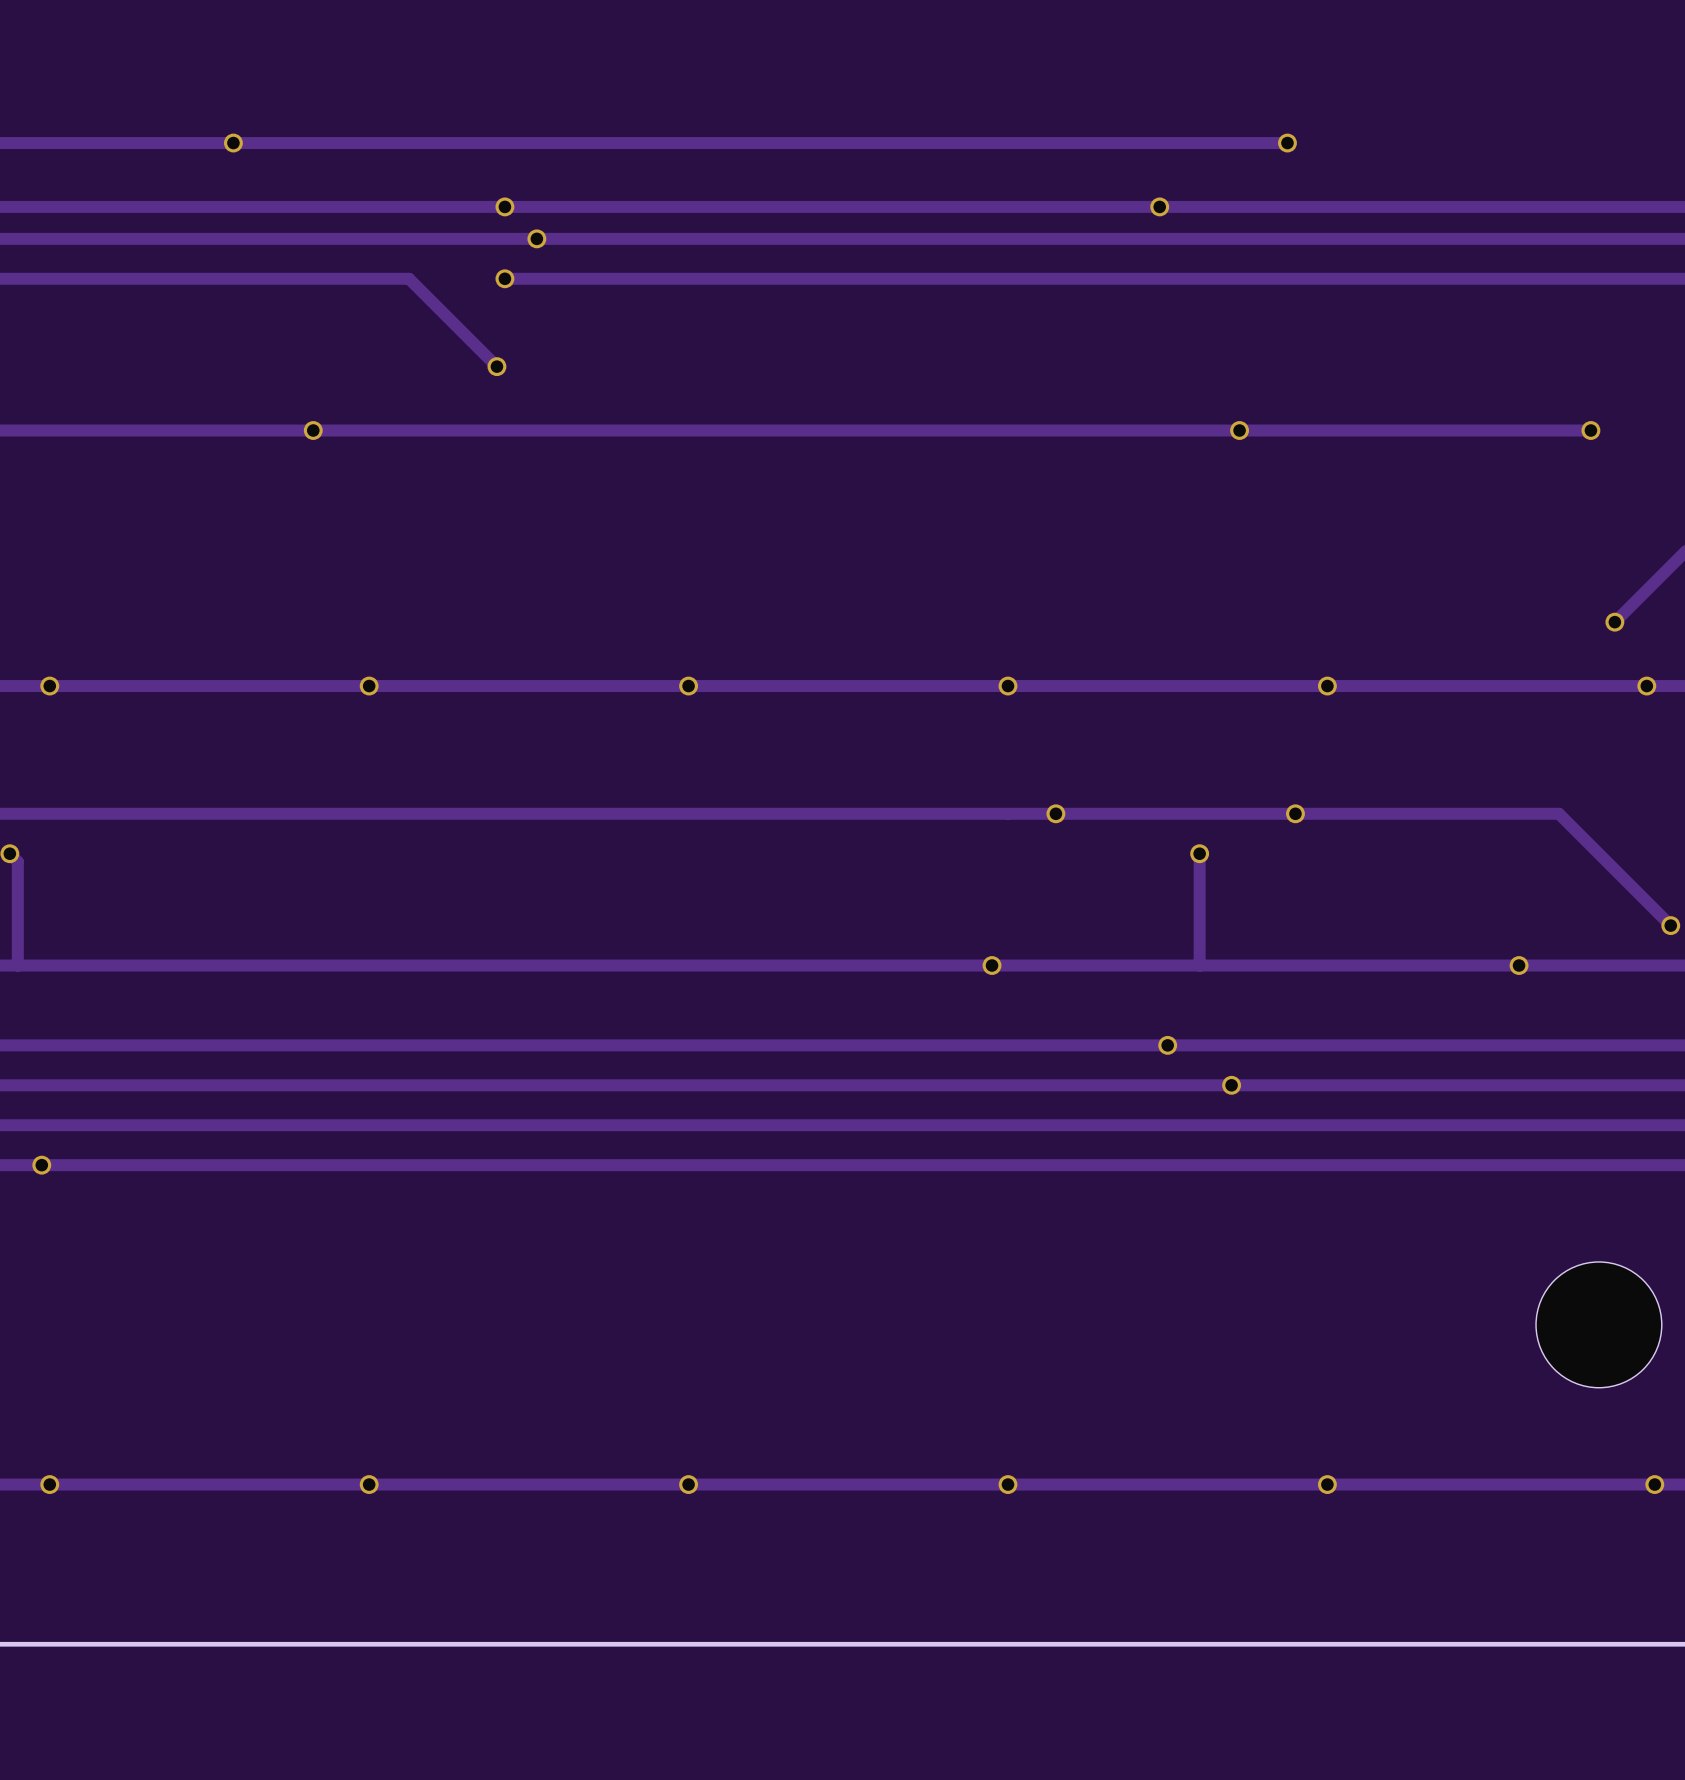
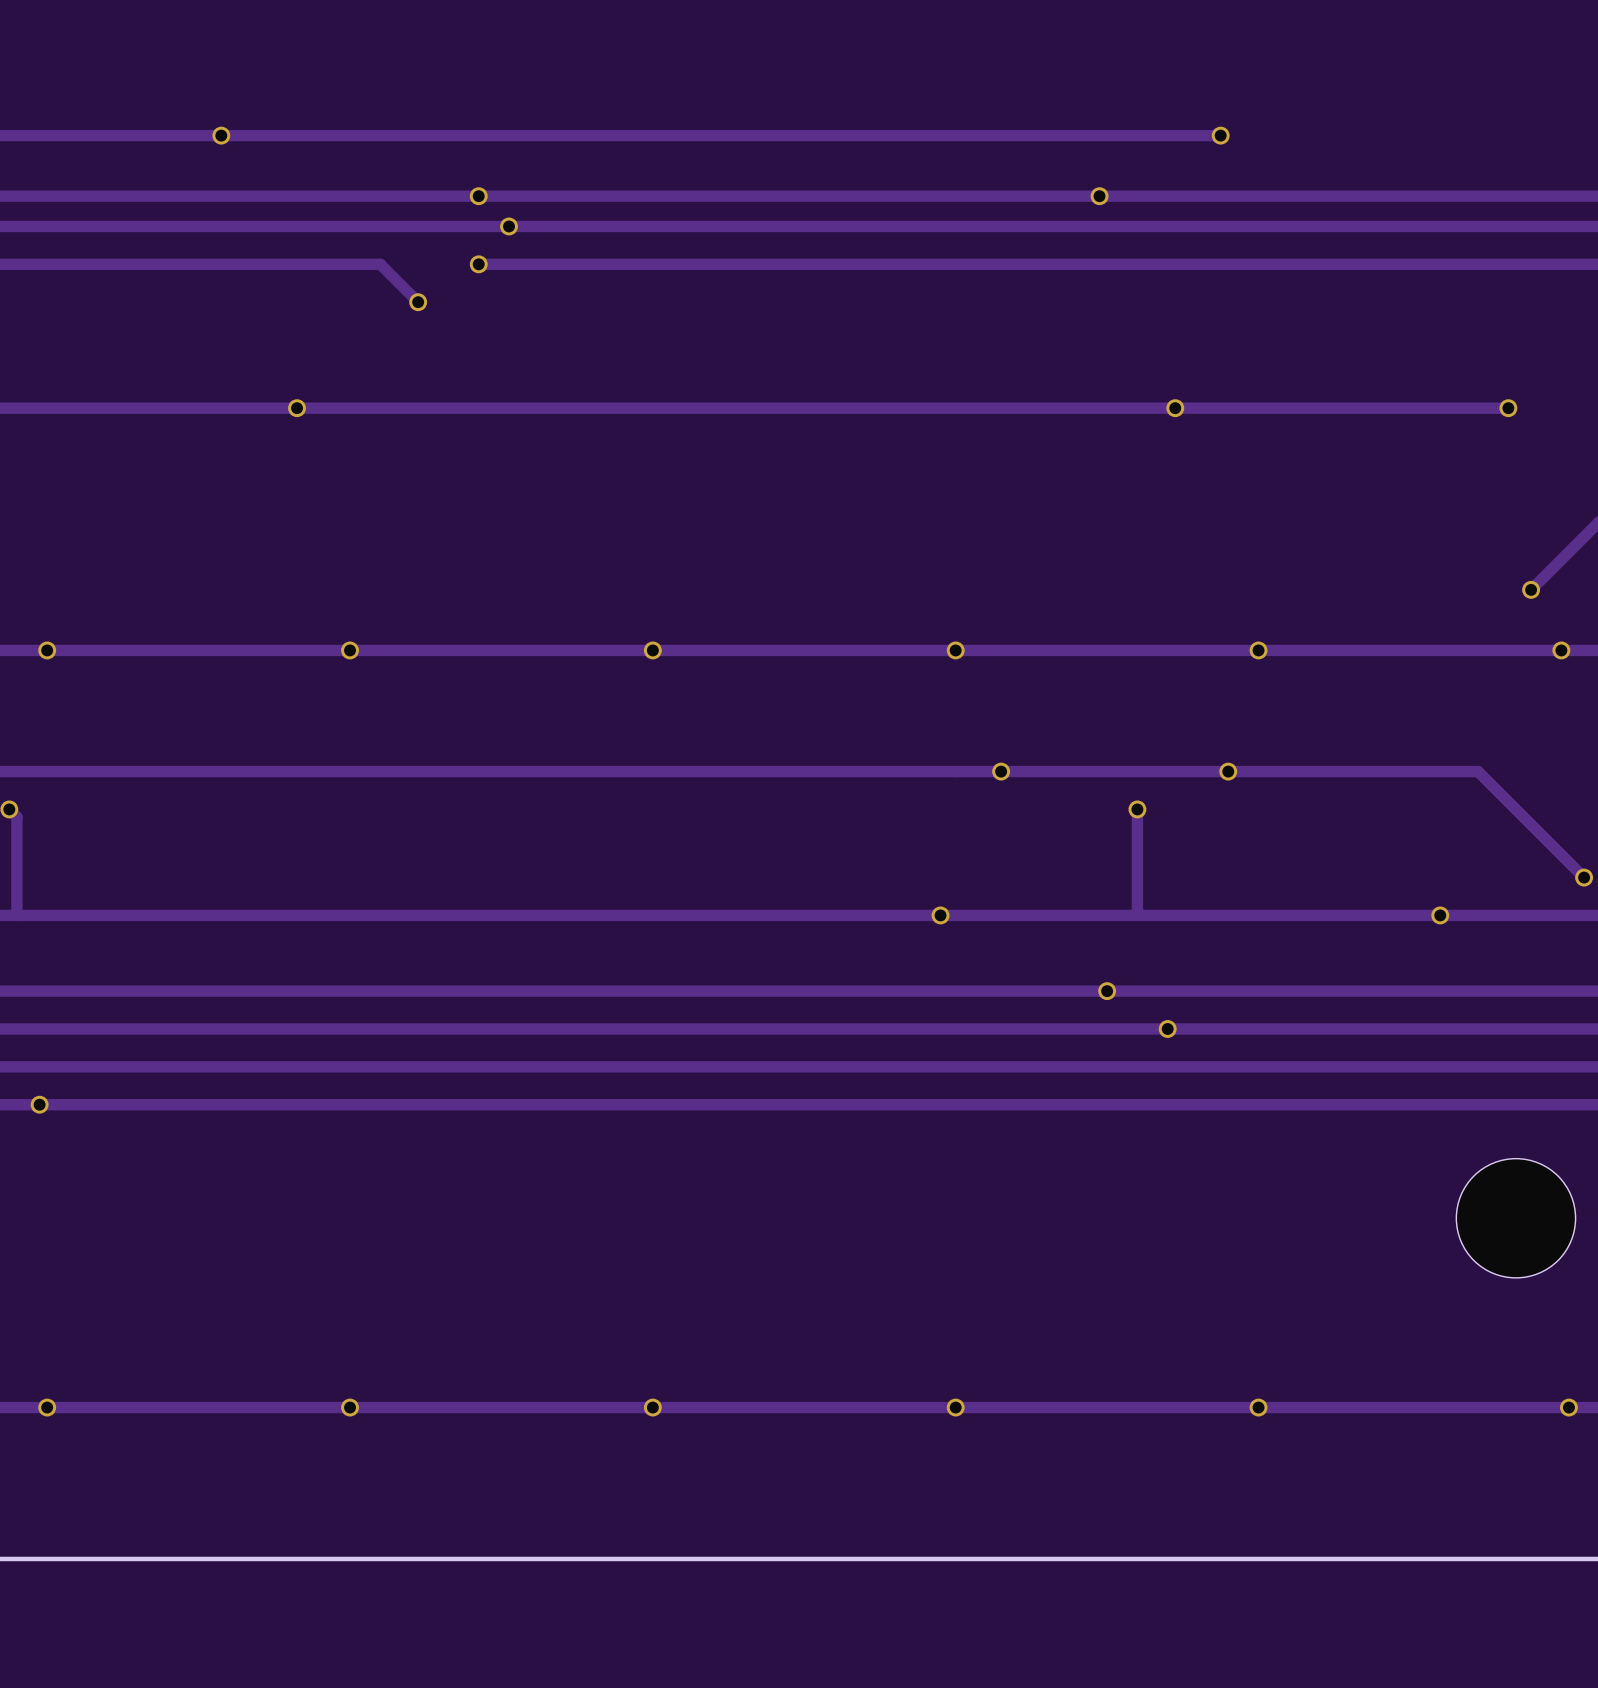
track: (401, 278) (409, 278) (496, 366) -> (380, 264) (418, 302)
via position: (496, 366) -> (418, 302)
part position: (1598, 1324) -> (1515, 1218)

